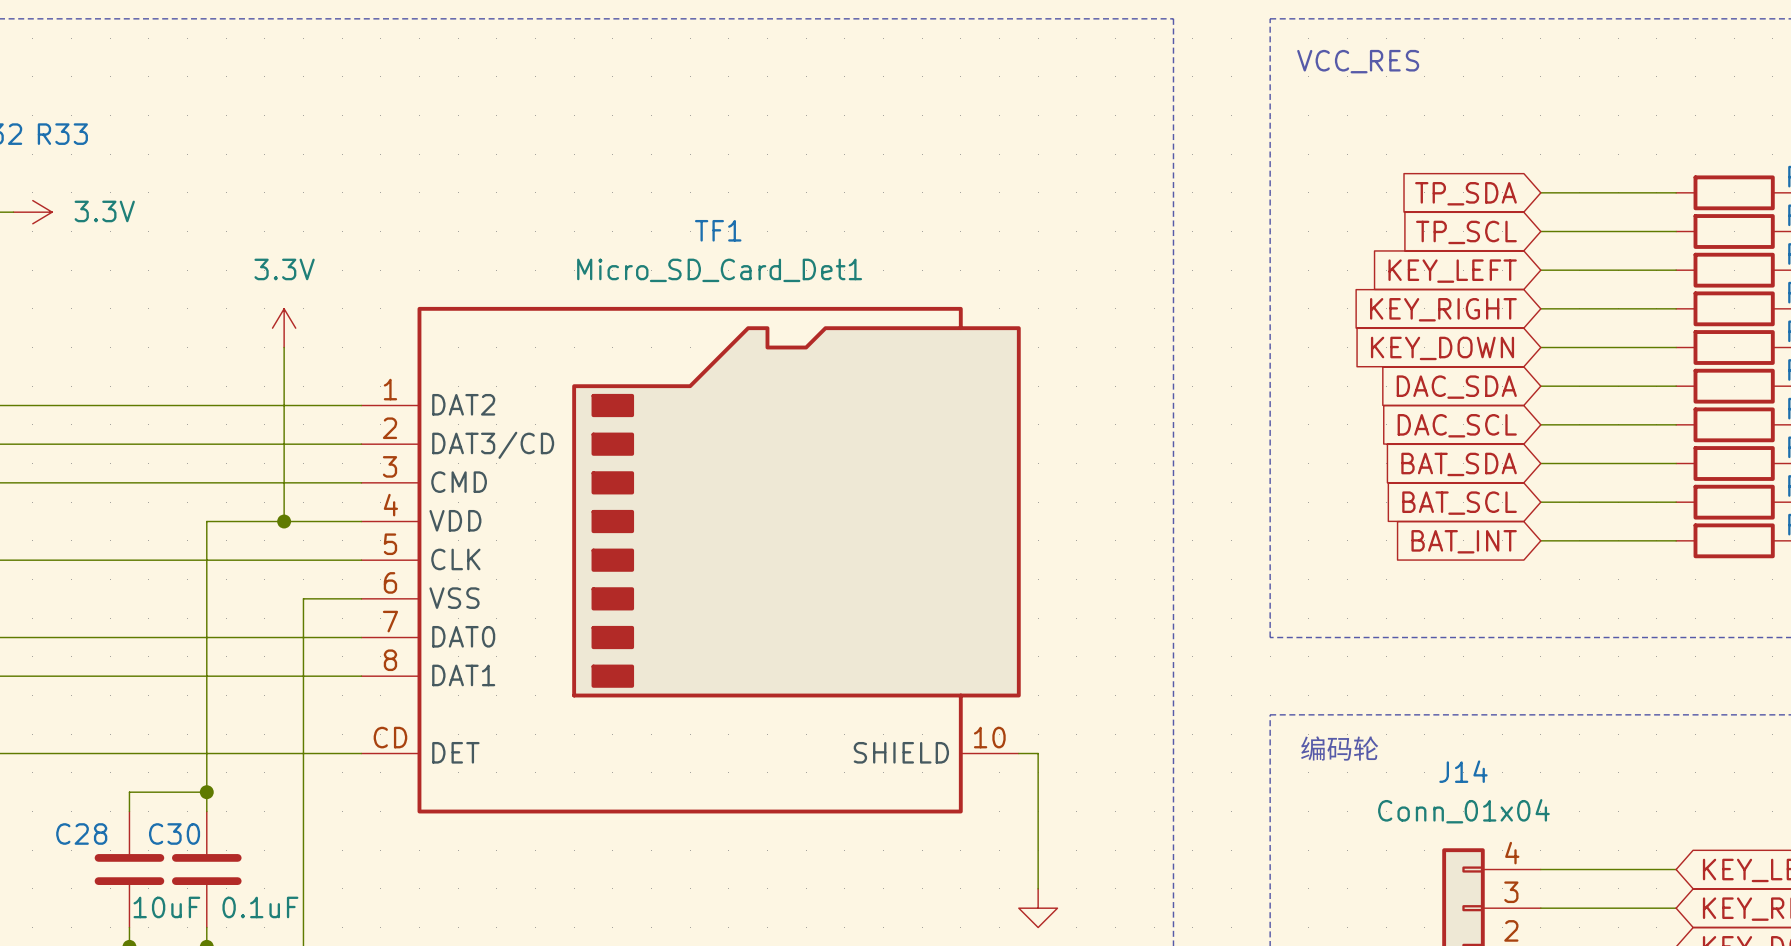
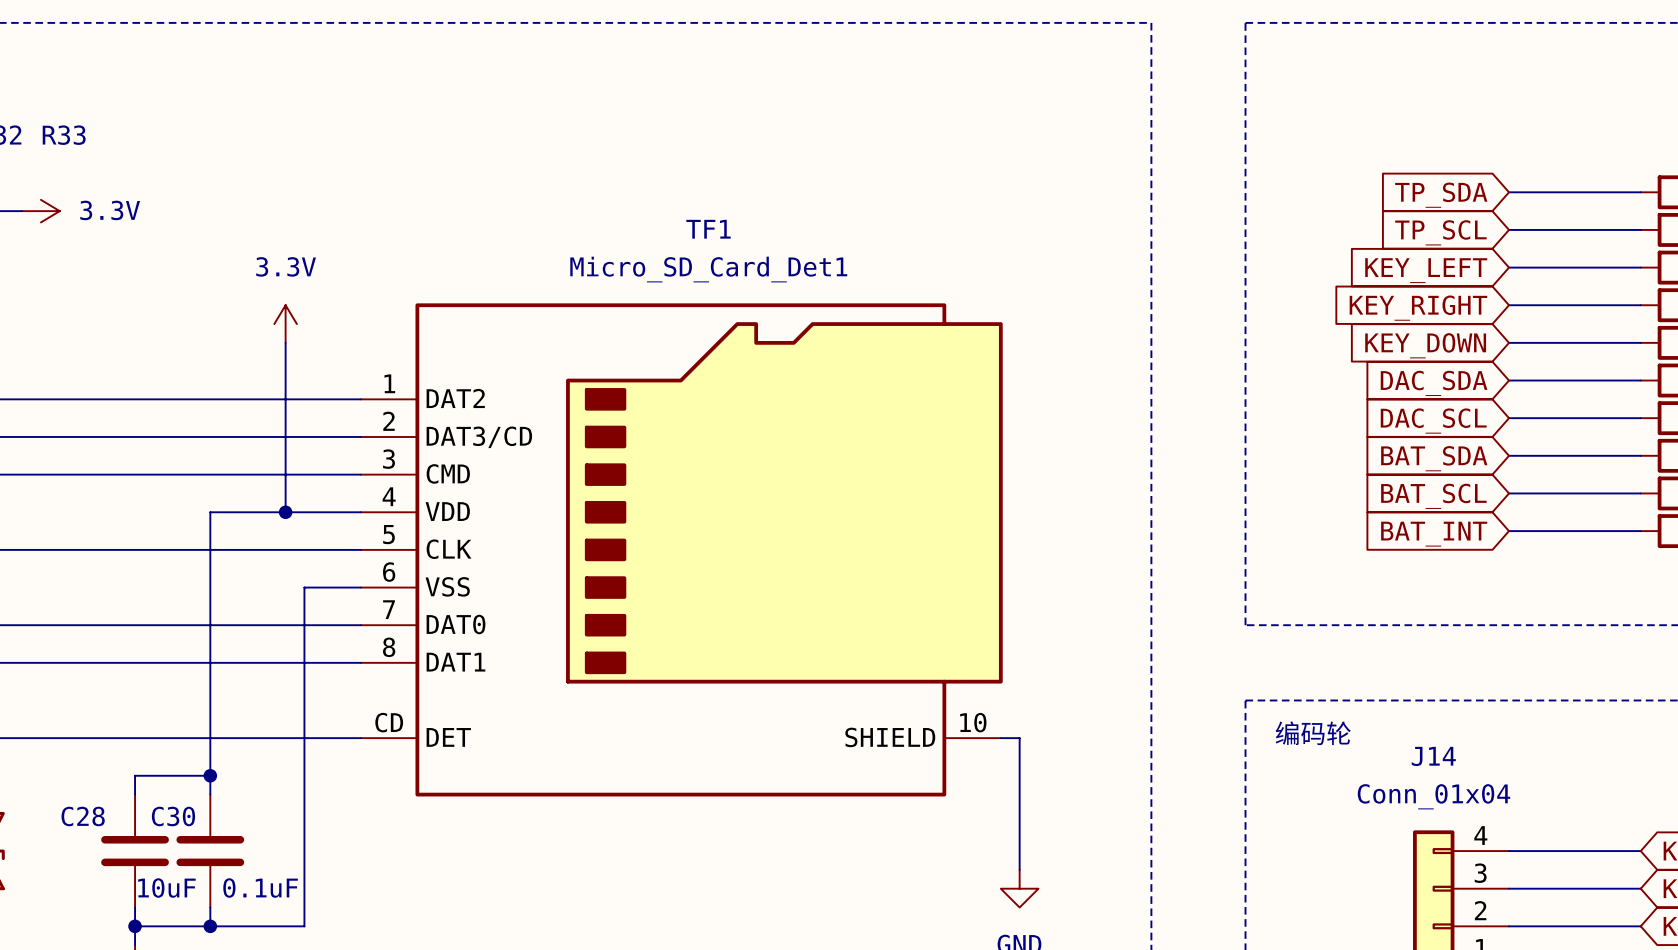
text: VCC_RES (1358, 61) -> none

